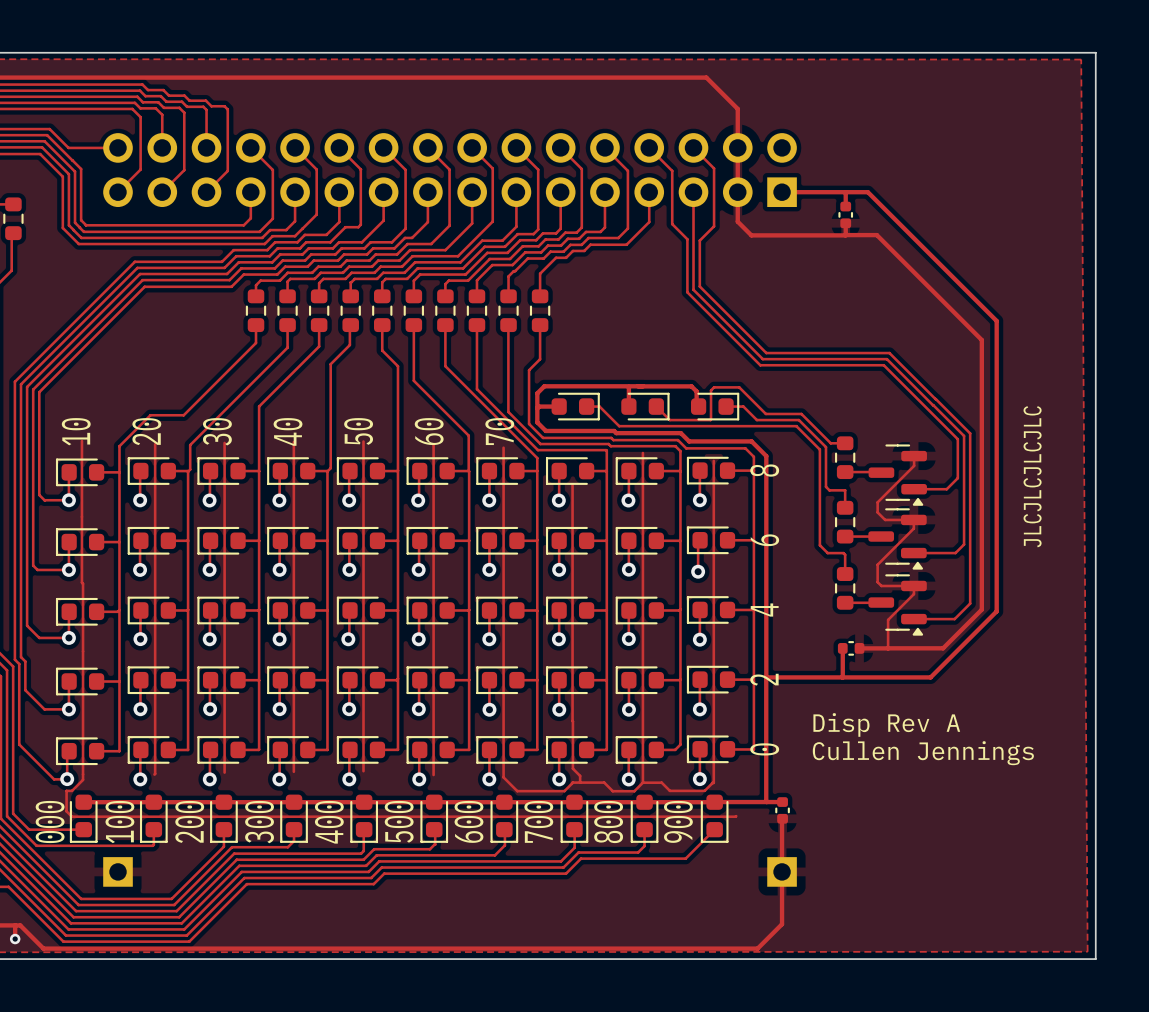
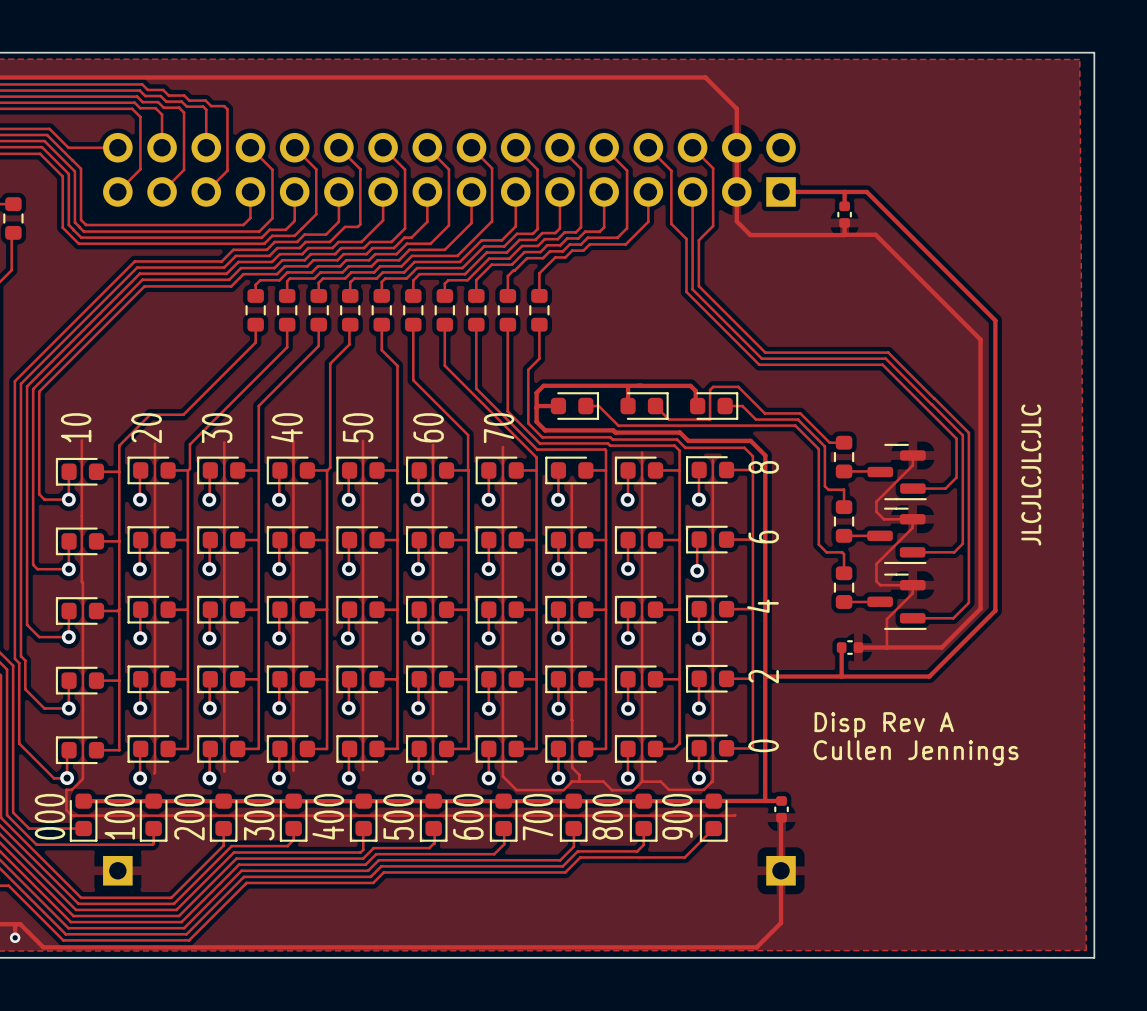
part footprint: [868, 444, 927, 506] -> [867, 443, 927, 501]
part footprint: [868, 508, 927, 570] -> [867, 507, 927, 565]
part footprint: [868, 574, 927, 636] -> [867, 573, 927, 630]

